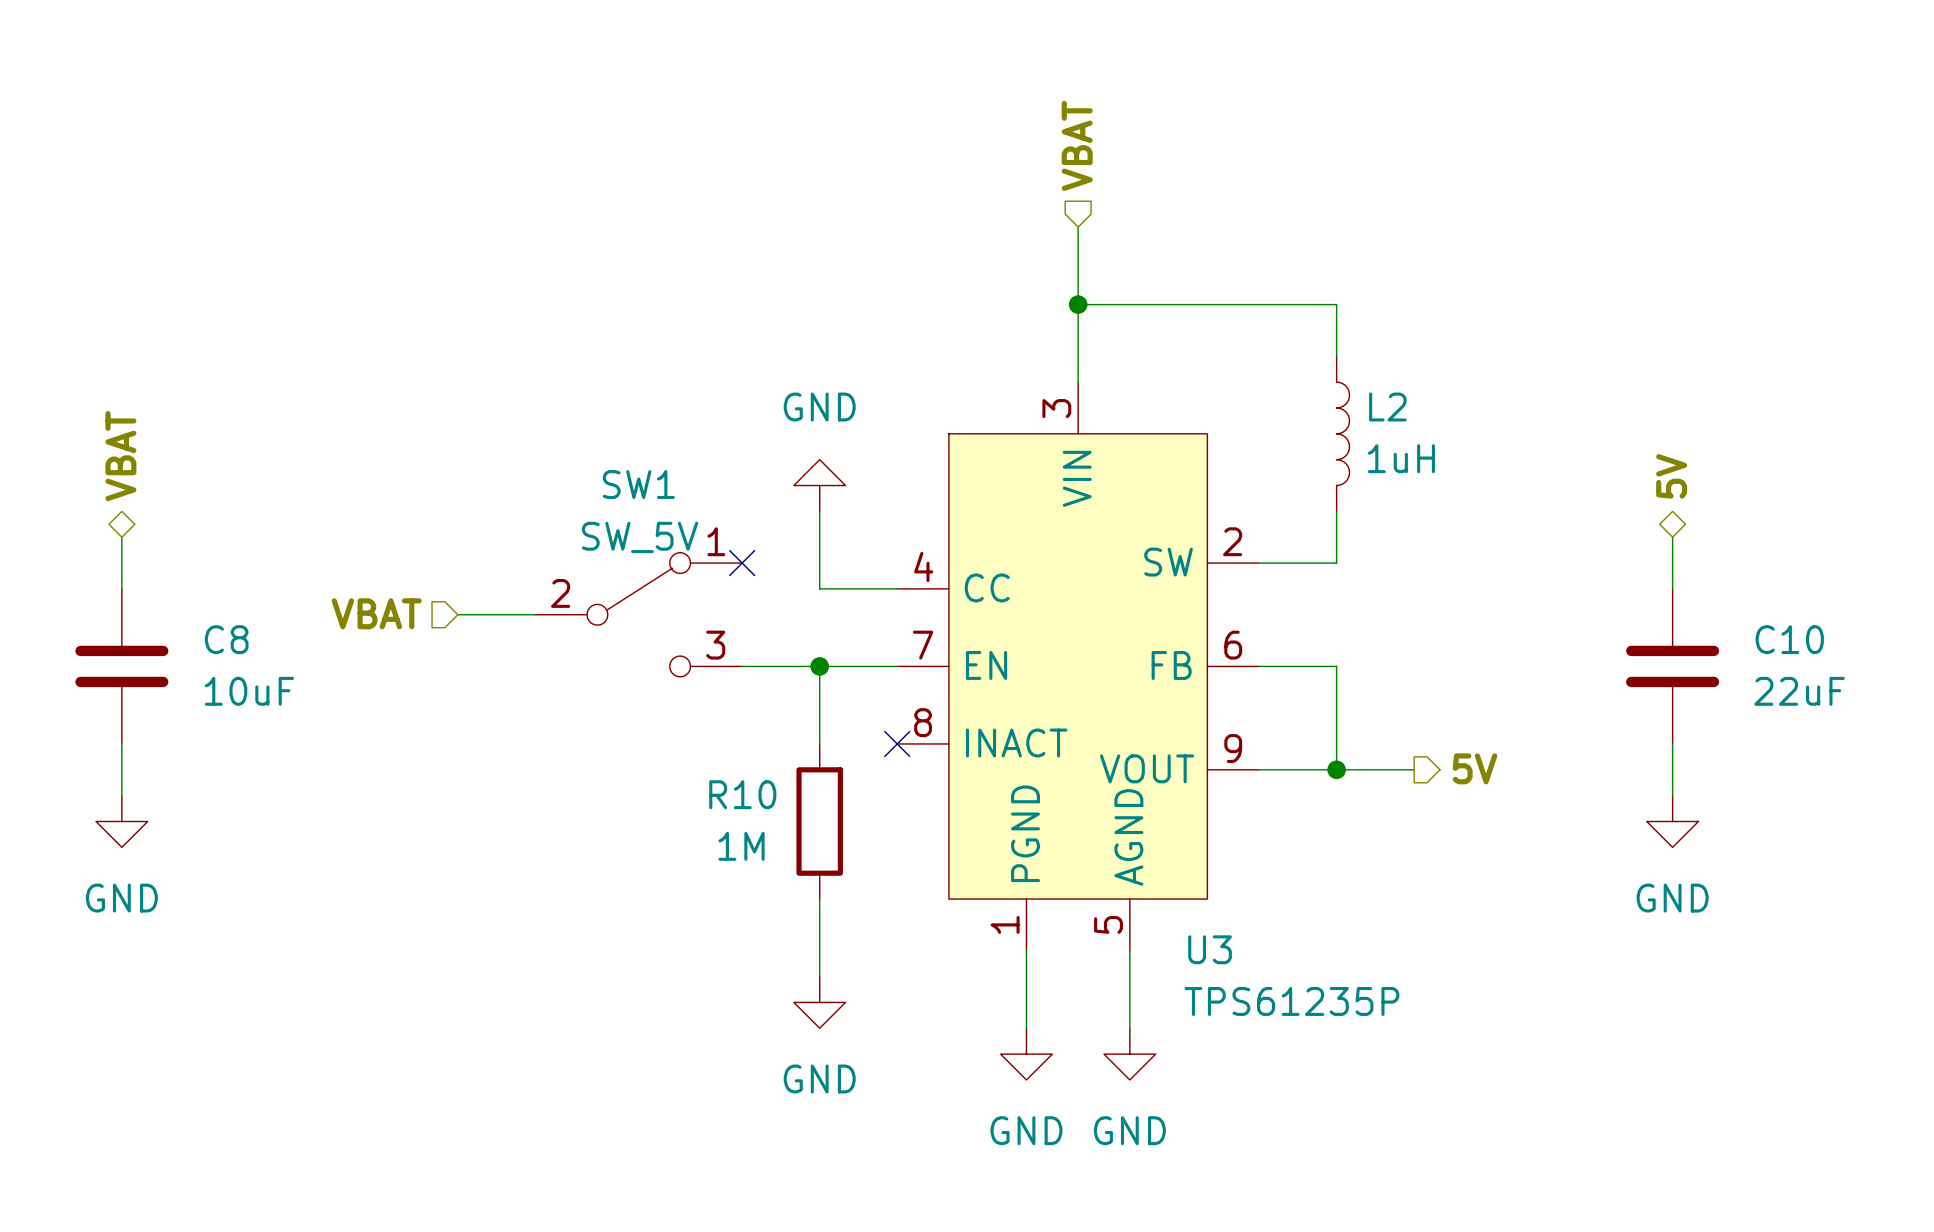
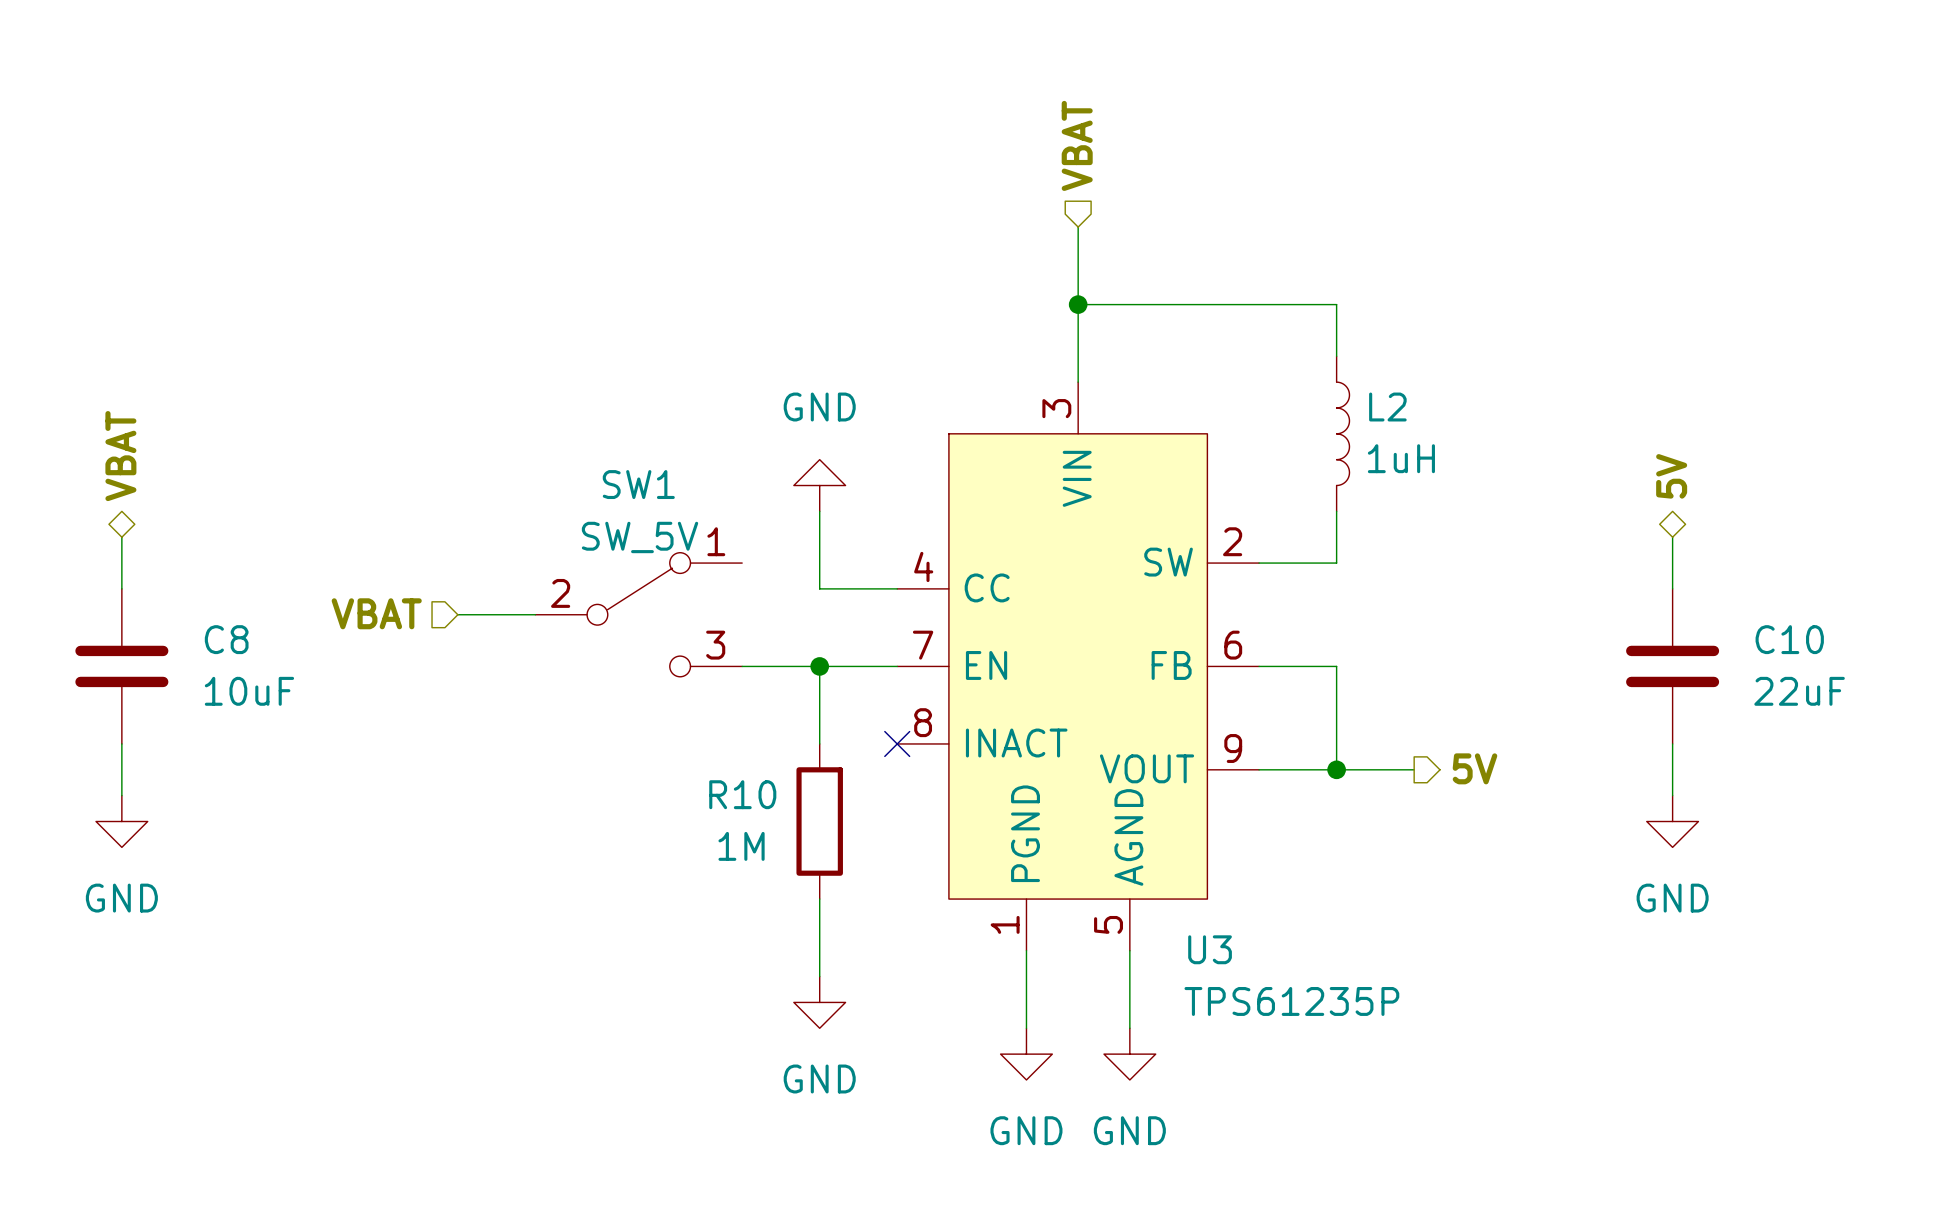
no-connect mark: (742, 563) -> none

